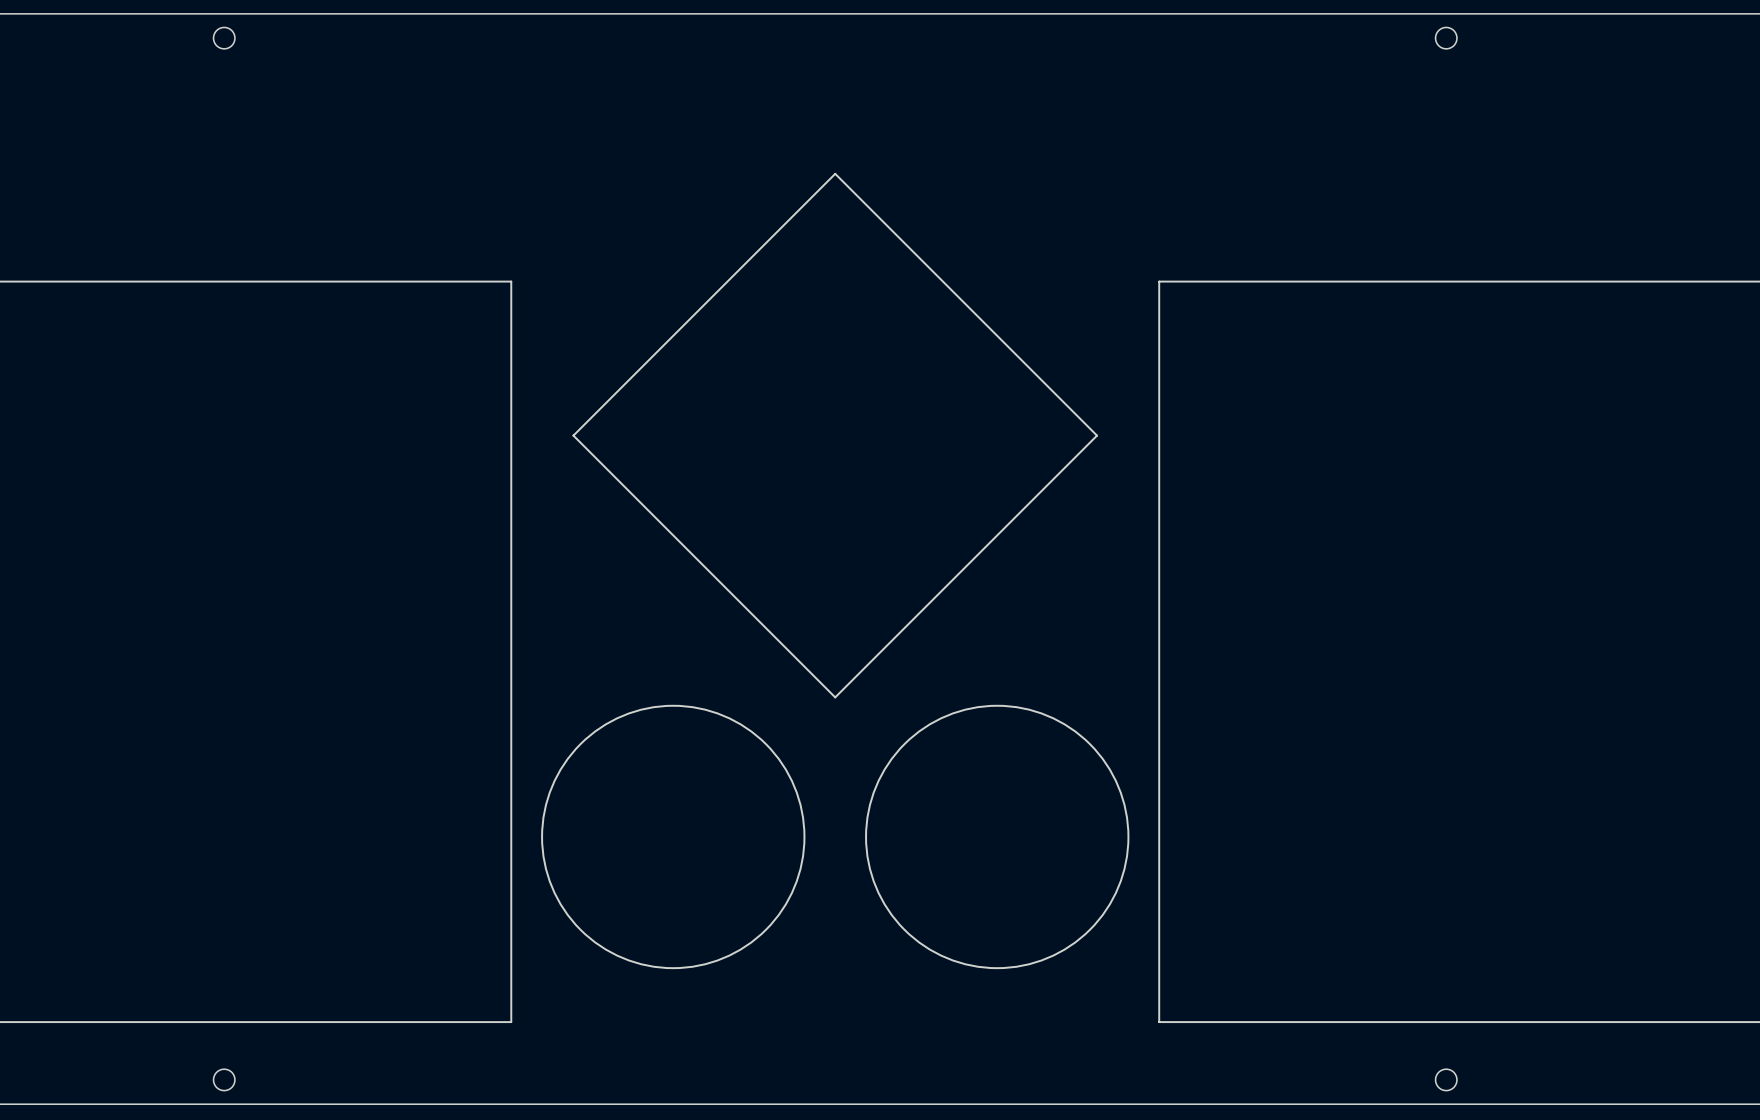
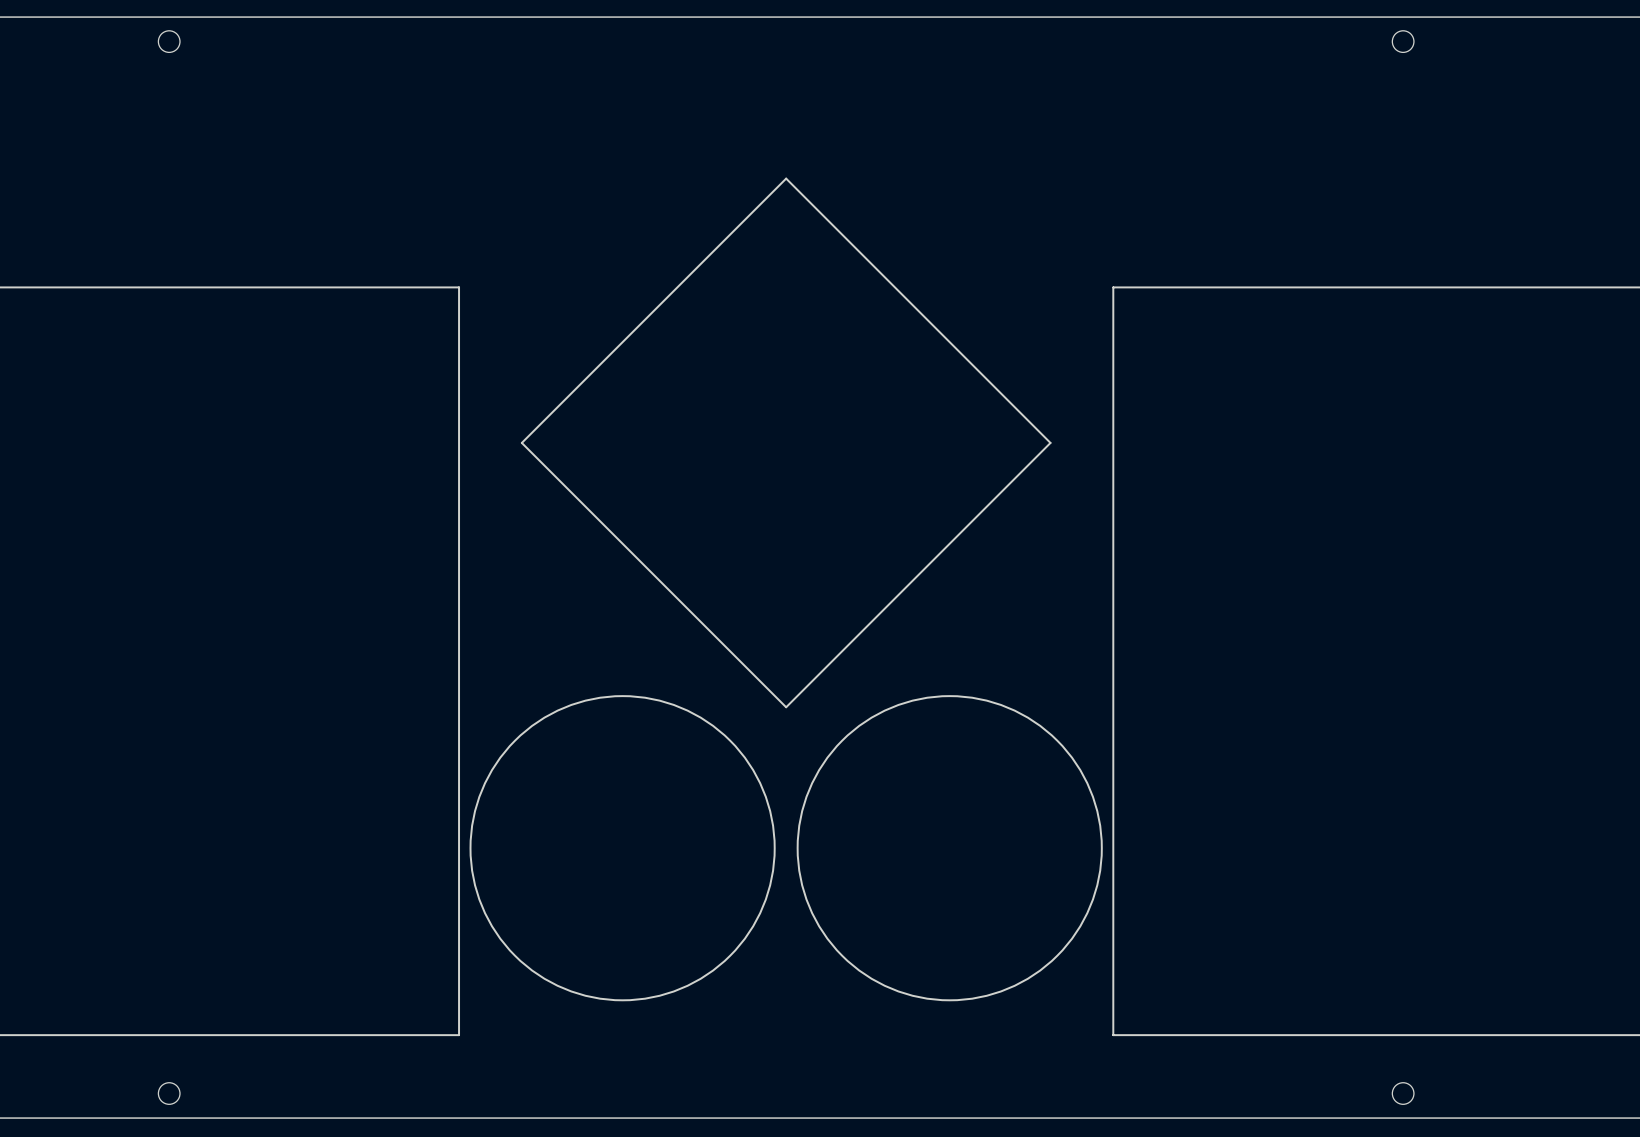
round board edge size: [541, 704, 806, 970] -> [469, 695, 776, 1002]
round board edge size: [865, 704, 1130, 970] -> [796, 695, 1103, 1002]

